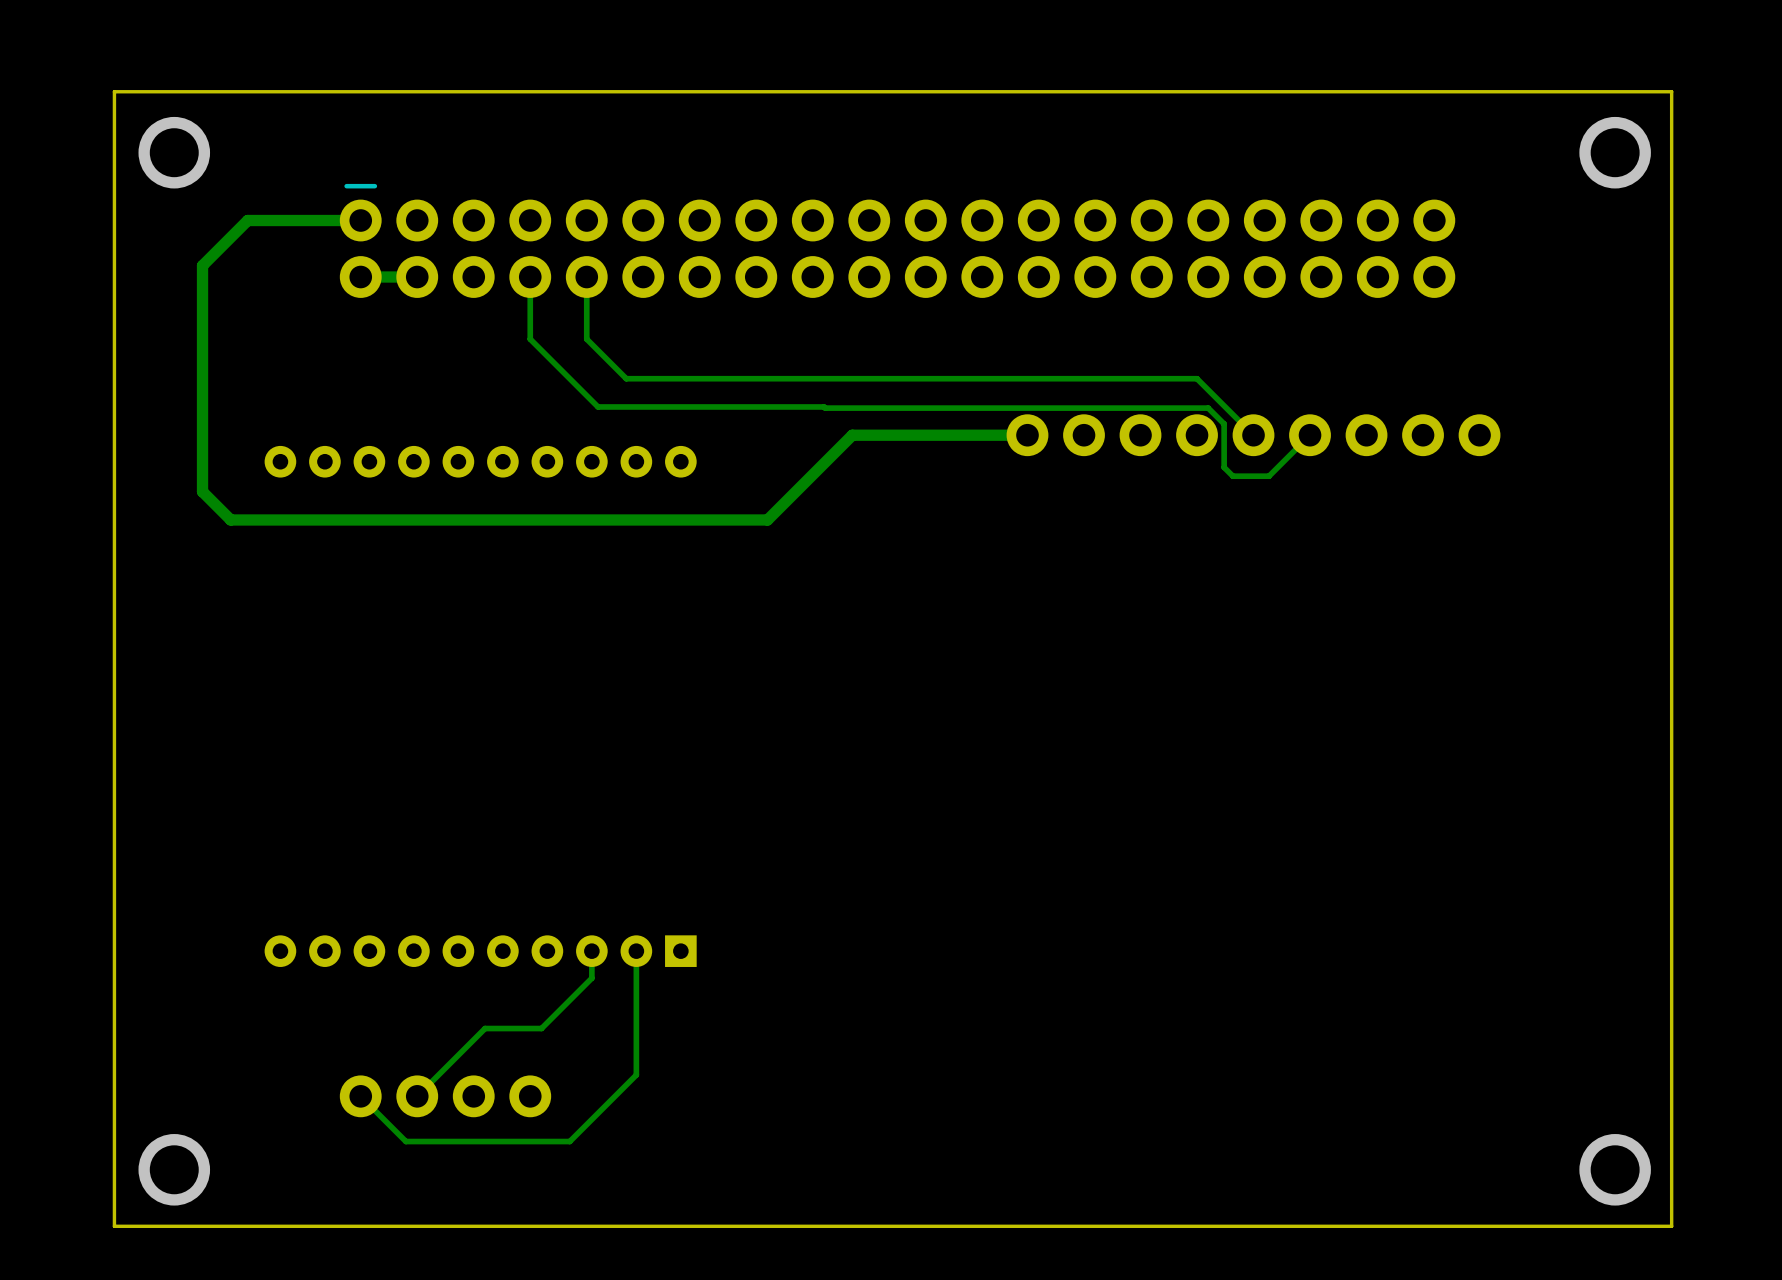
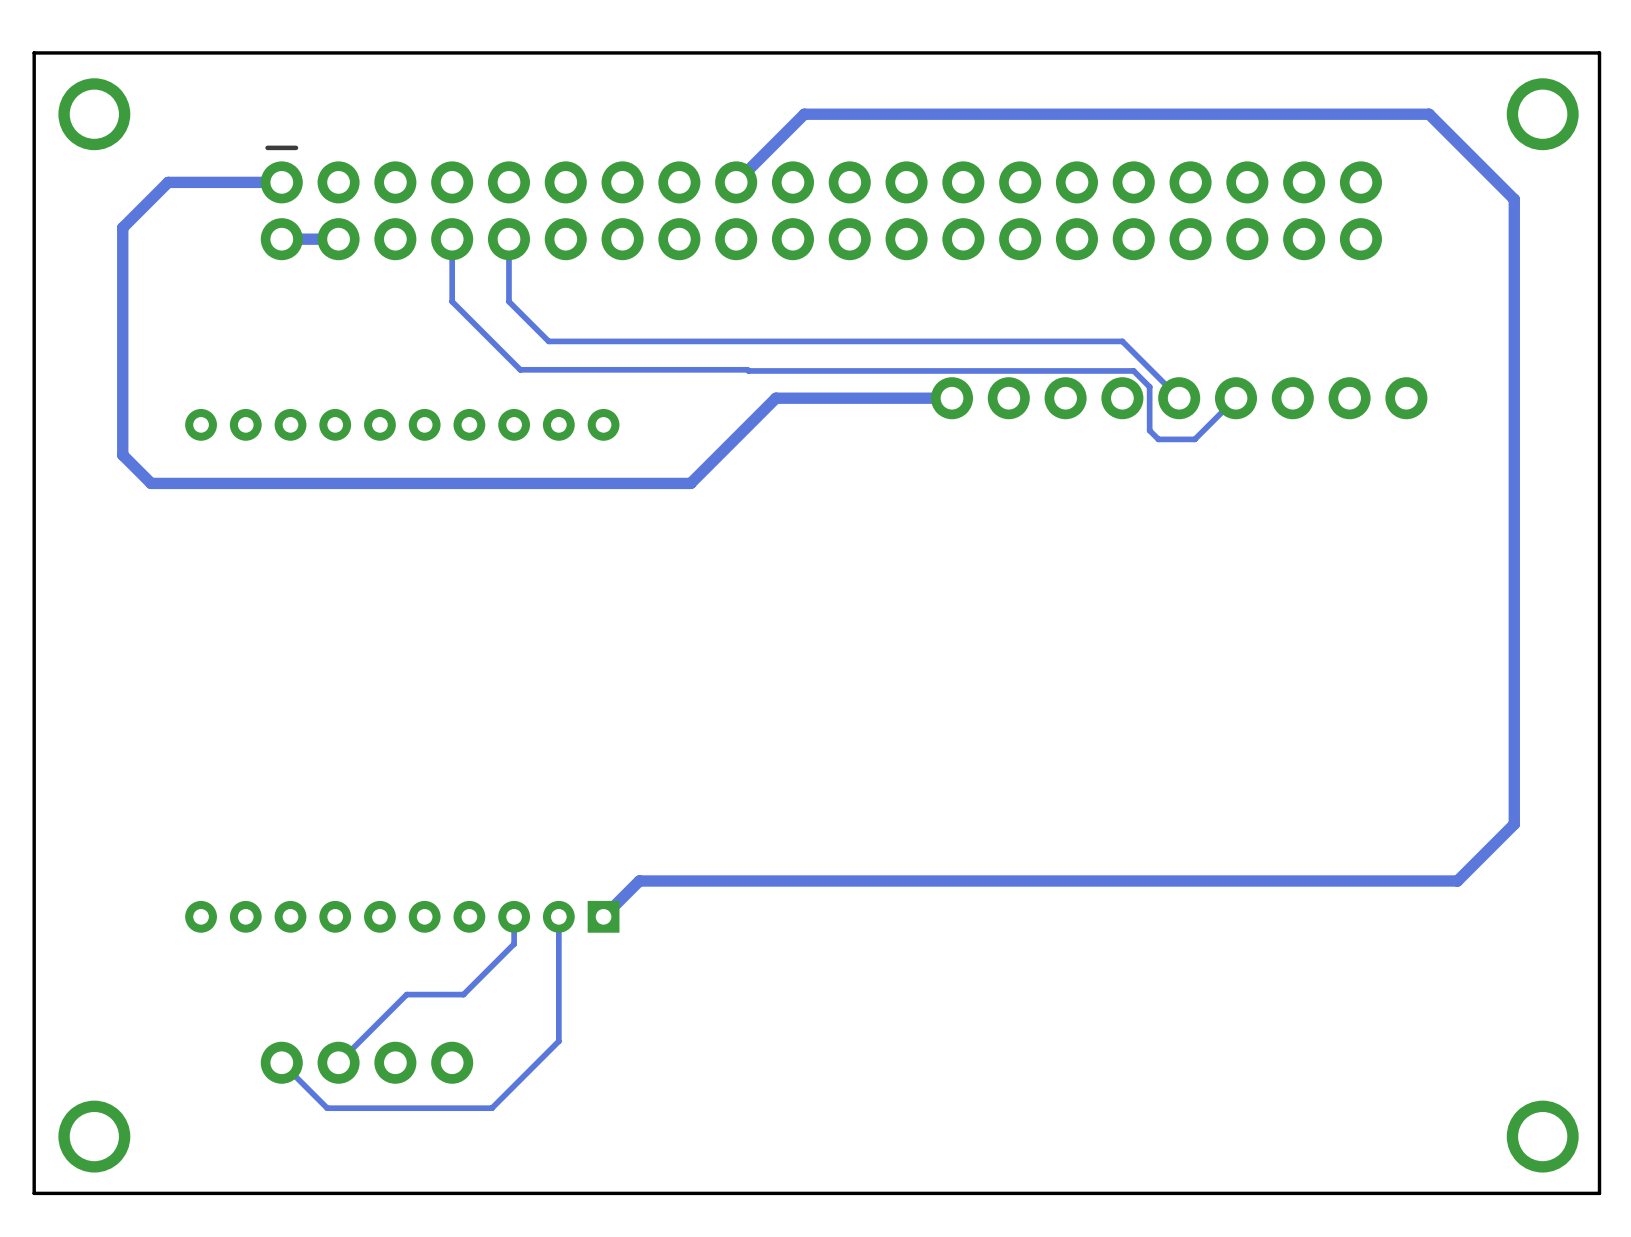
track: none -> (736, 182) (804, 114) (1429, 114) (1514, 199) (1514, 824) (1457, 881) (639, 881) (603, 916)

